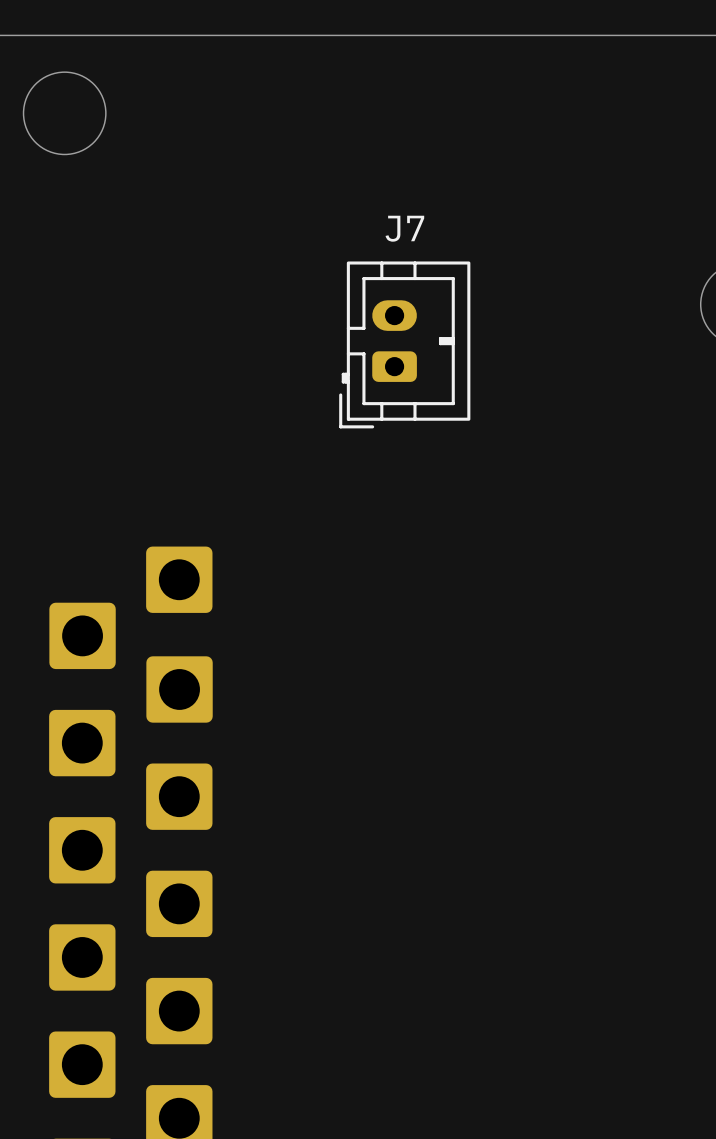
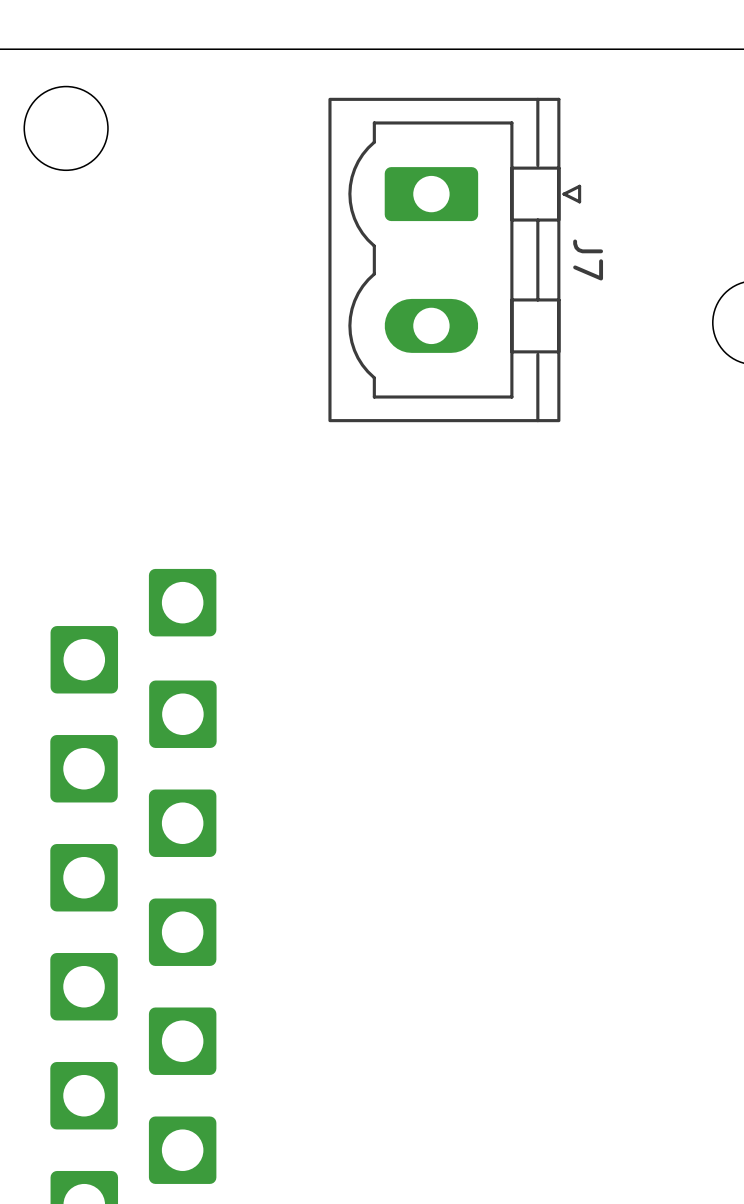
J7 name position: J7 (404, 228) -> J7 (588, 259)
J7 footprint: [339, 261, 471, 429] -> [328, 97, 582, 423]

